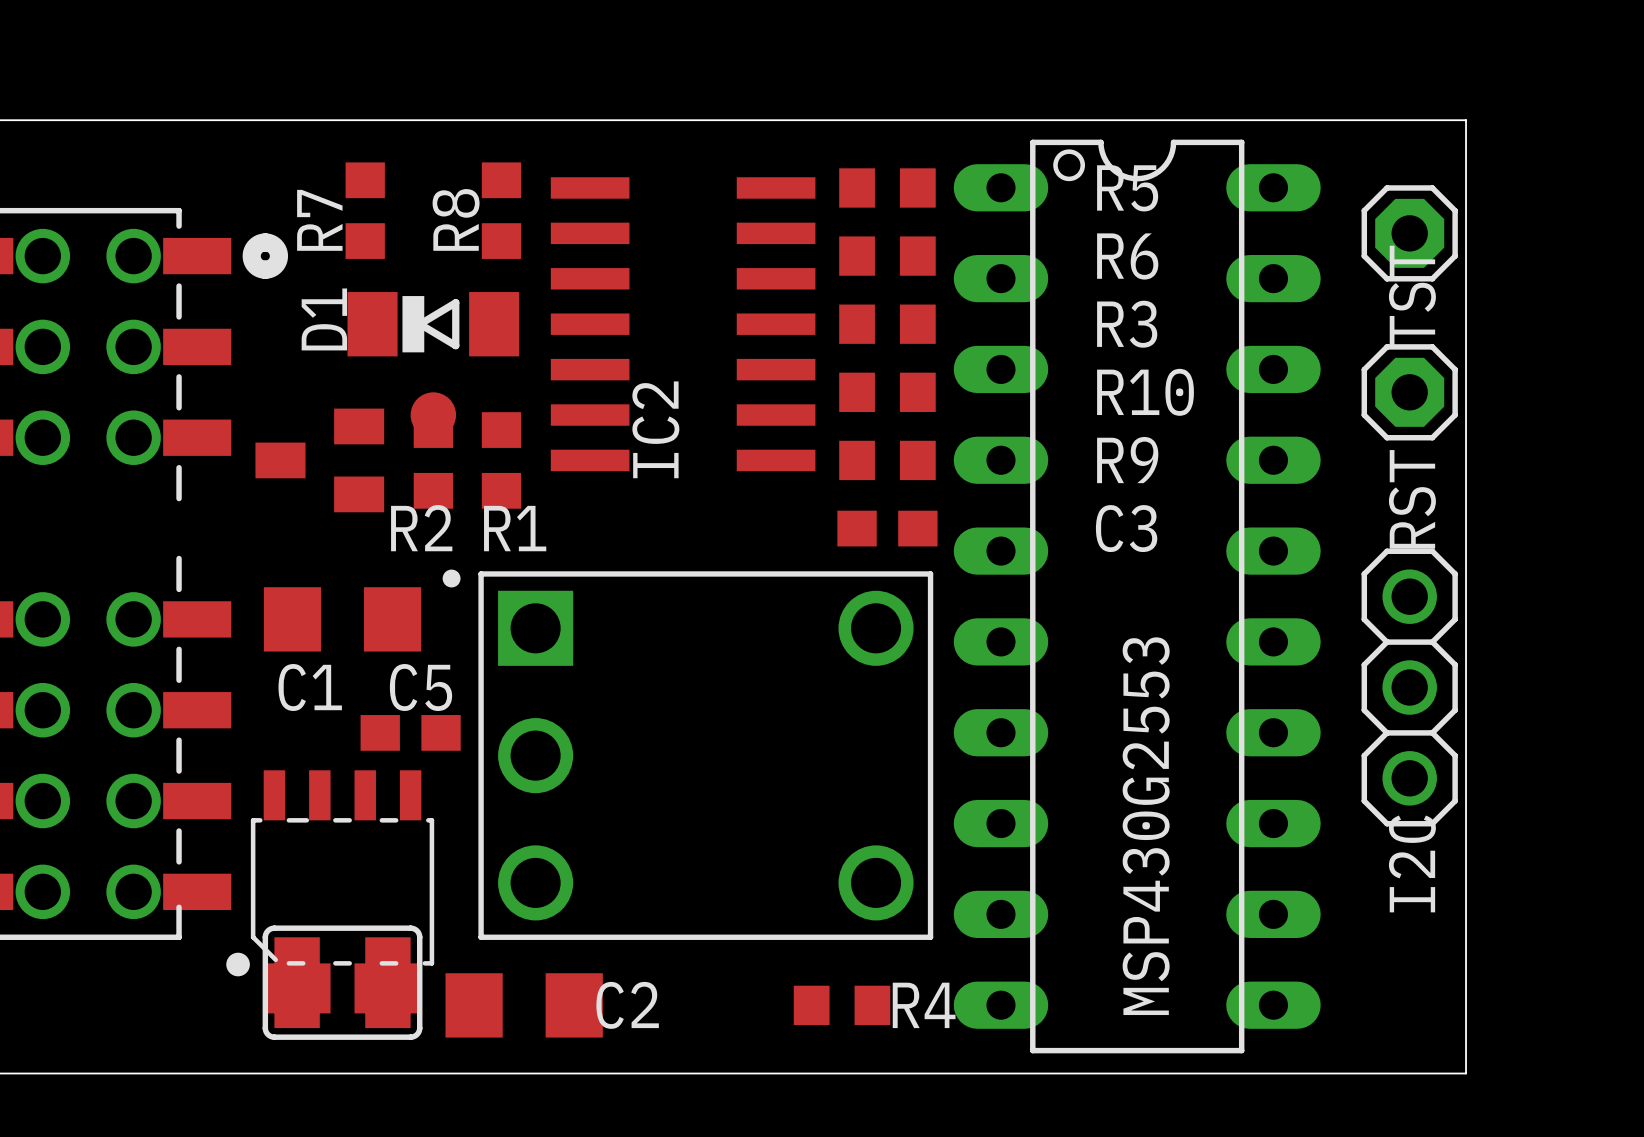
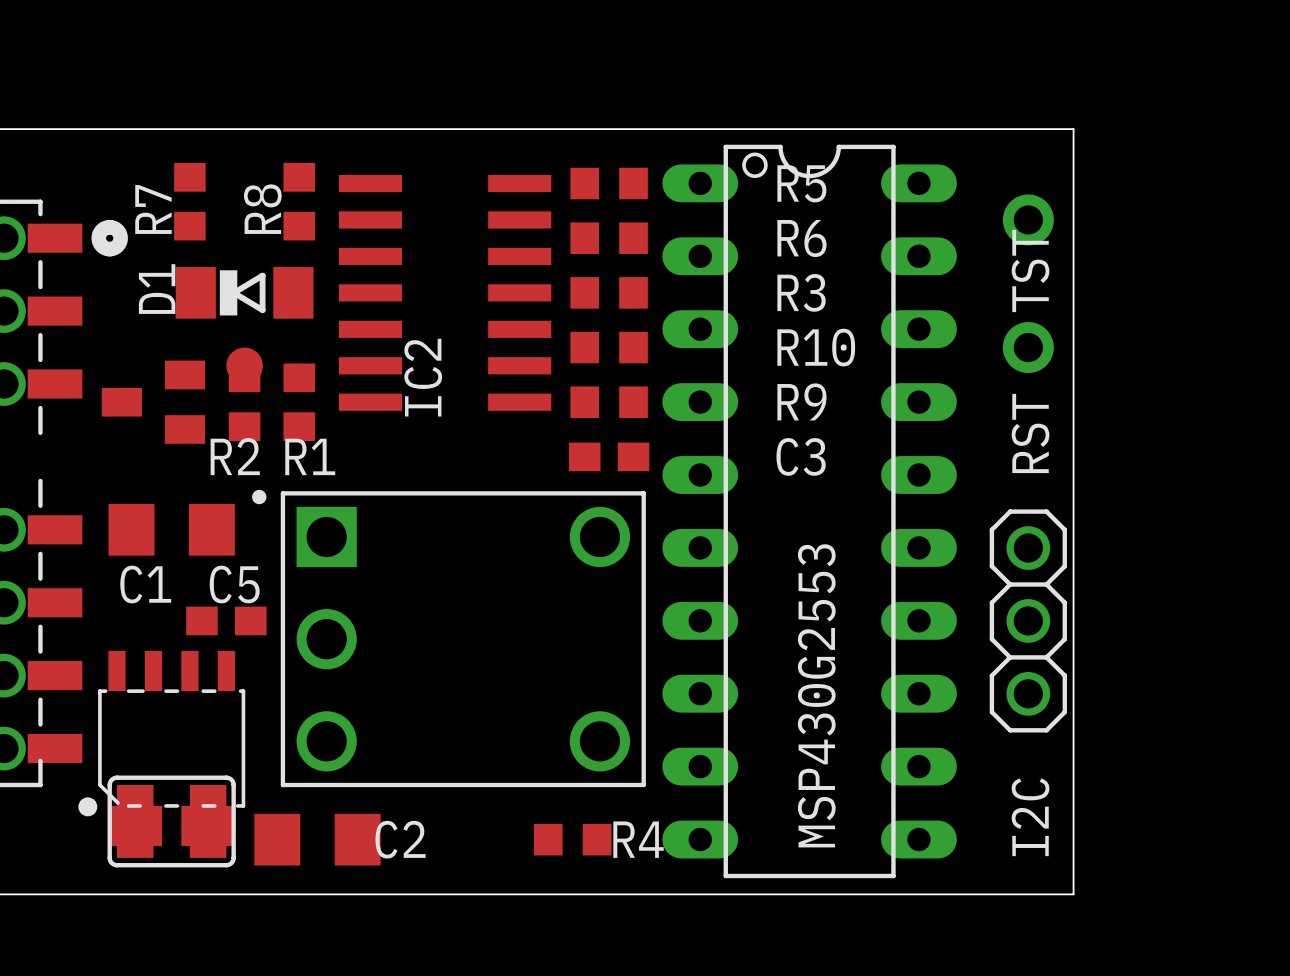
TST footprint: [1361, 185, 1458, 282] -> [1002, 194, 1054, 246]
RST footprint: [1361, 344, 1458, 441] -> [1002, 322, 1054, 374]
I2C position: (1409, 687) -> (1028, 620)
I2C name position: I2C (1412, 863) -> I2C (1030, 817)

